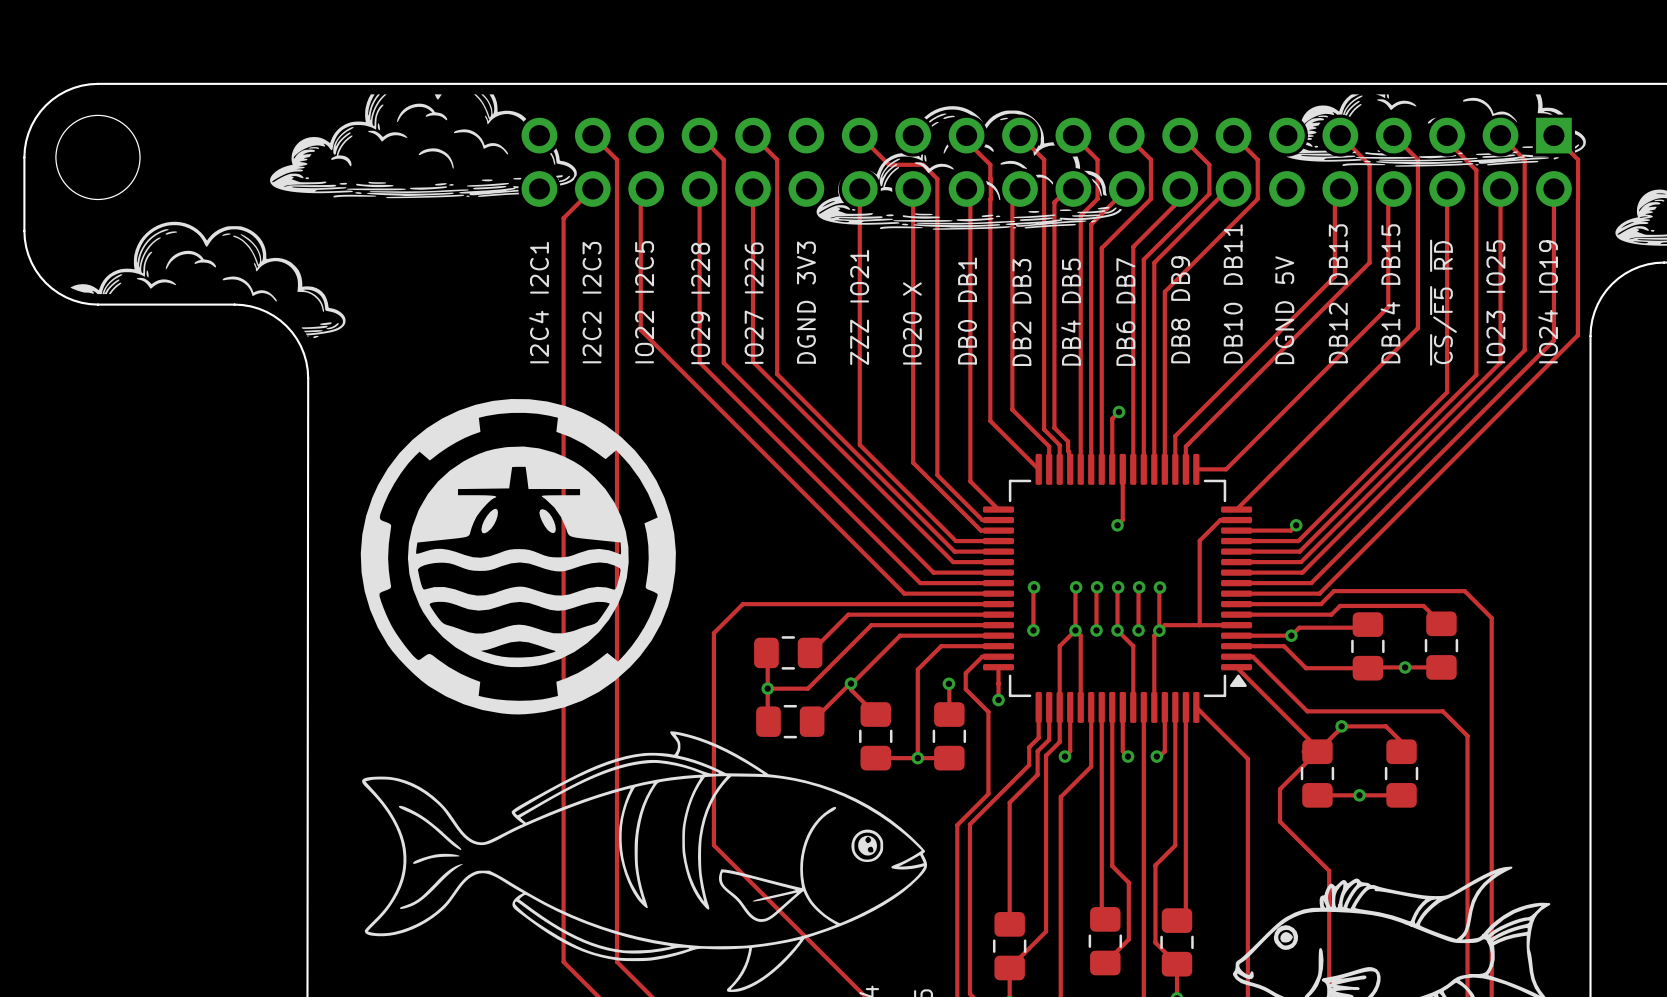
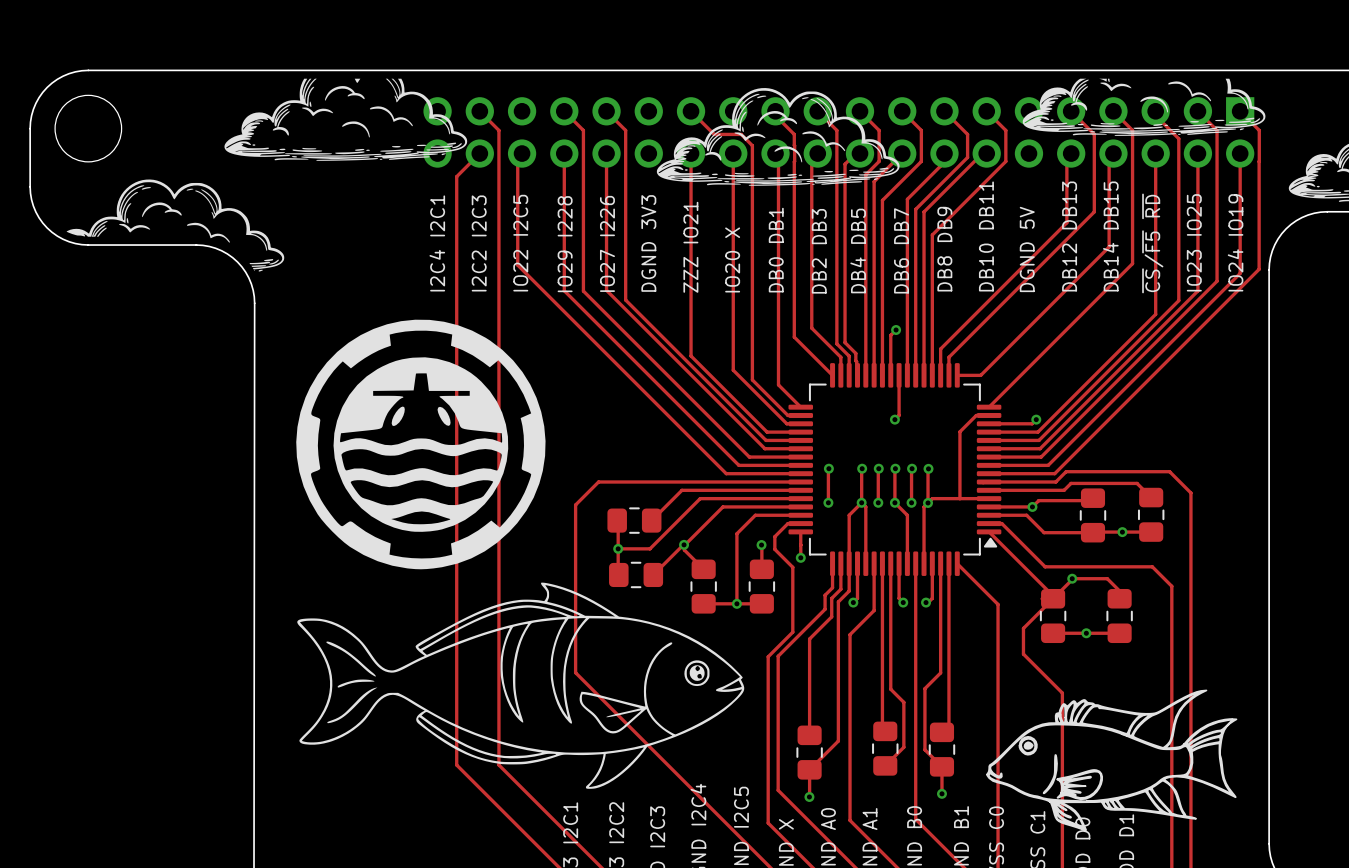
drawing shape: [270, 94, 577, 199] -> [224, 78, 468, 161]
drawing shape: [1286, 94, 1586, 167] -> [1022, 78, 1266, 136]
drawing shape: [816, 106, 1123, 230] -> [656, 88, 900, 186]

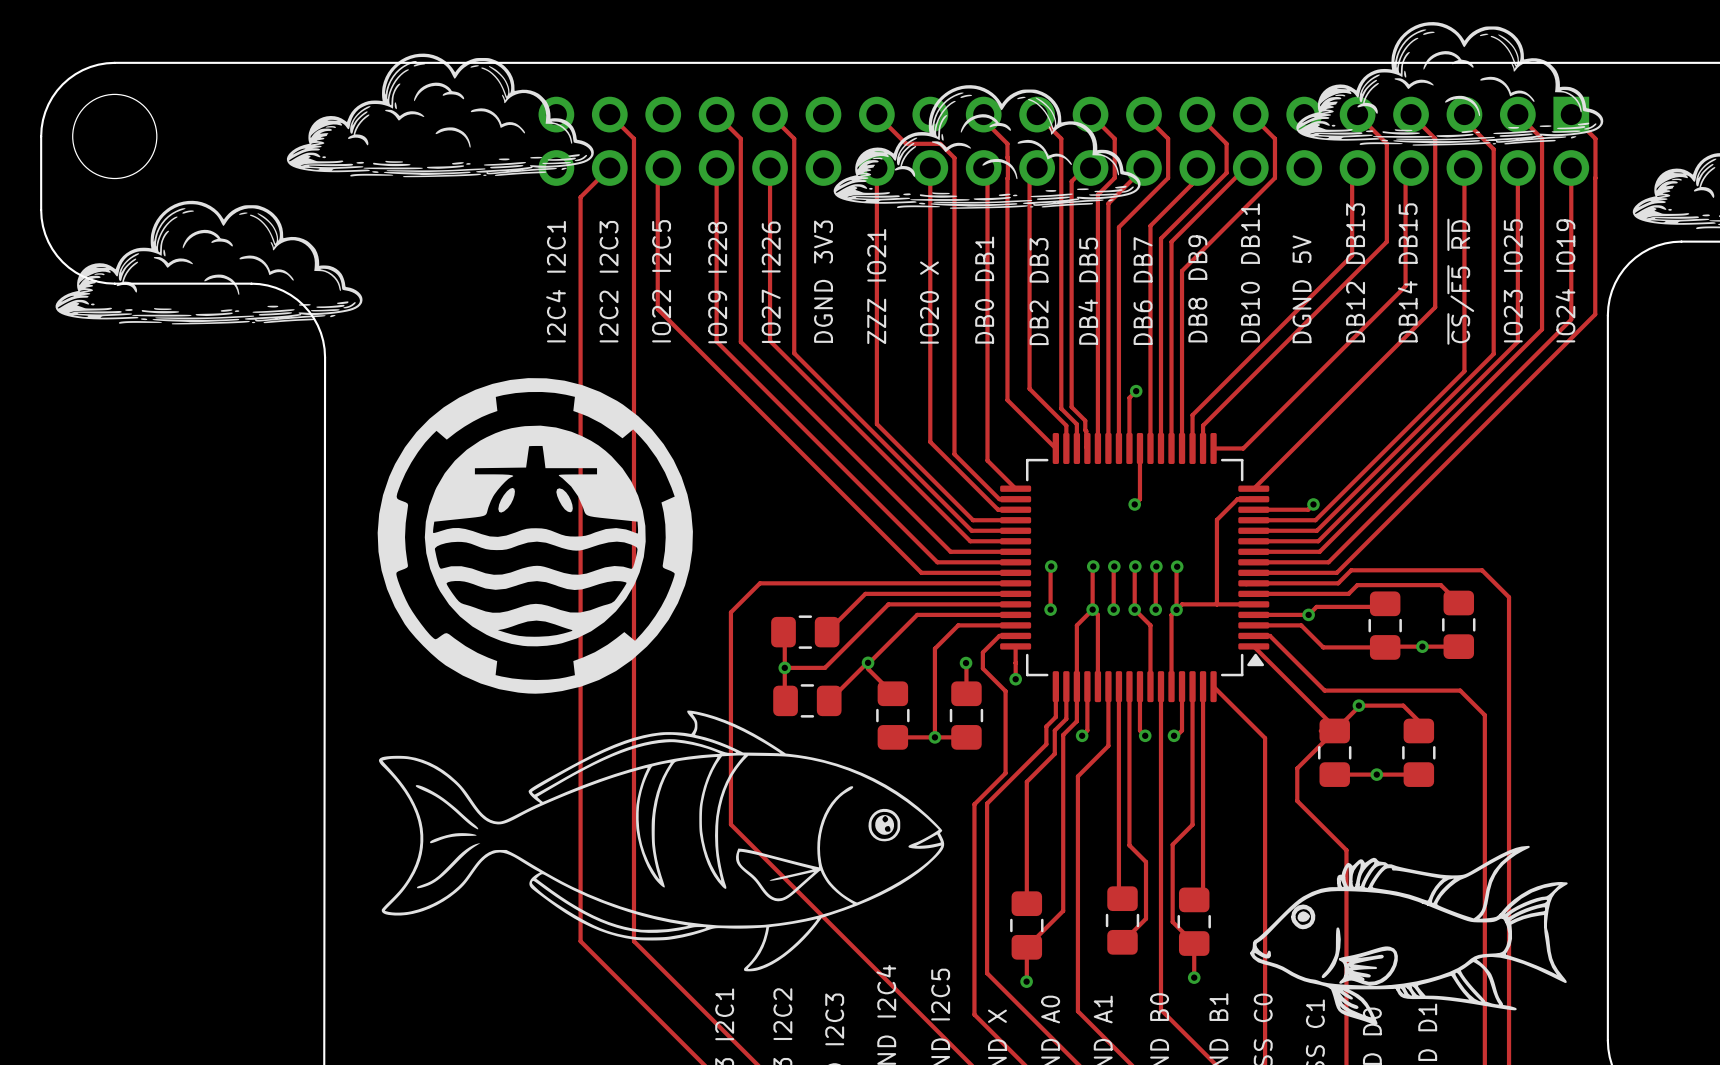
drawing: none -> [1296, 22, 1604, 146]
drawing shape: [224, 78, 468, 161] -> [286, 53, 594, 178]
drawing: [1022, 78, 1266, 136] -> none
drawing shape: [66, 179, 285, 272] -> [55, 200, 363, 325]

